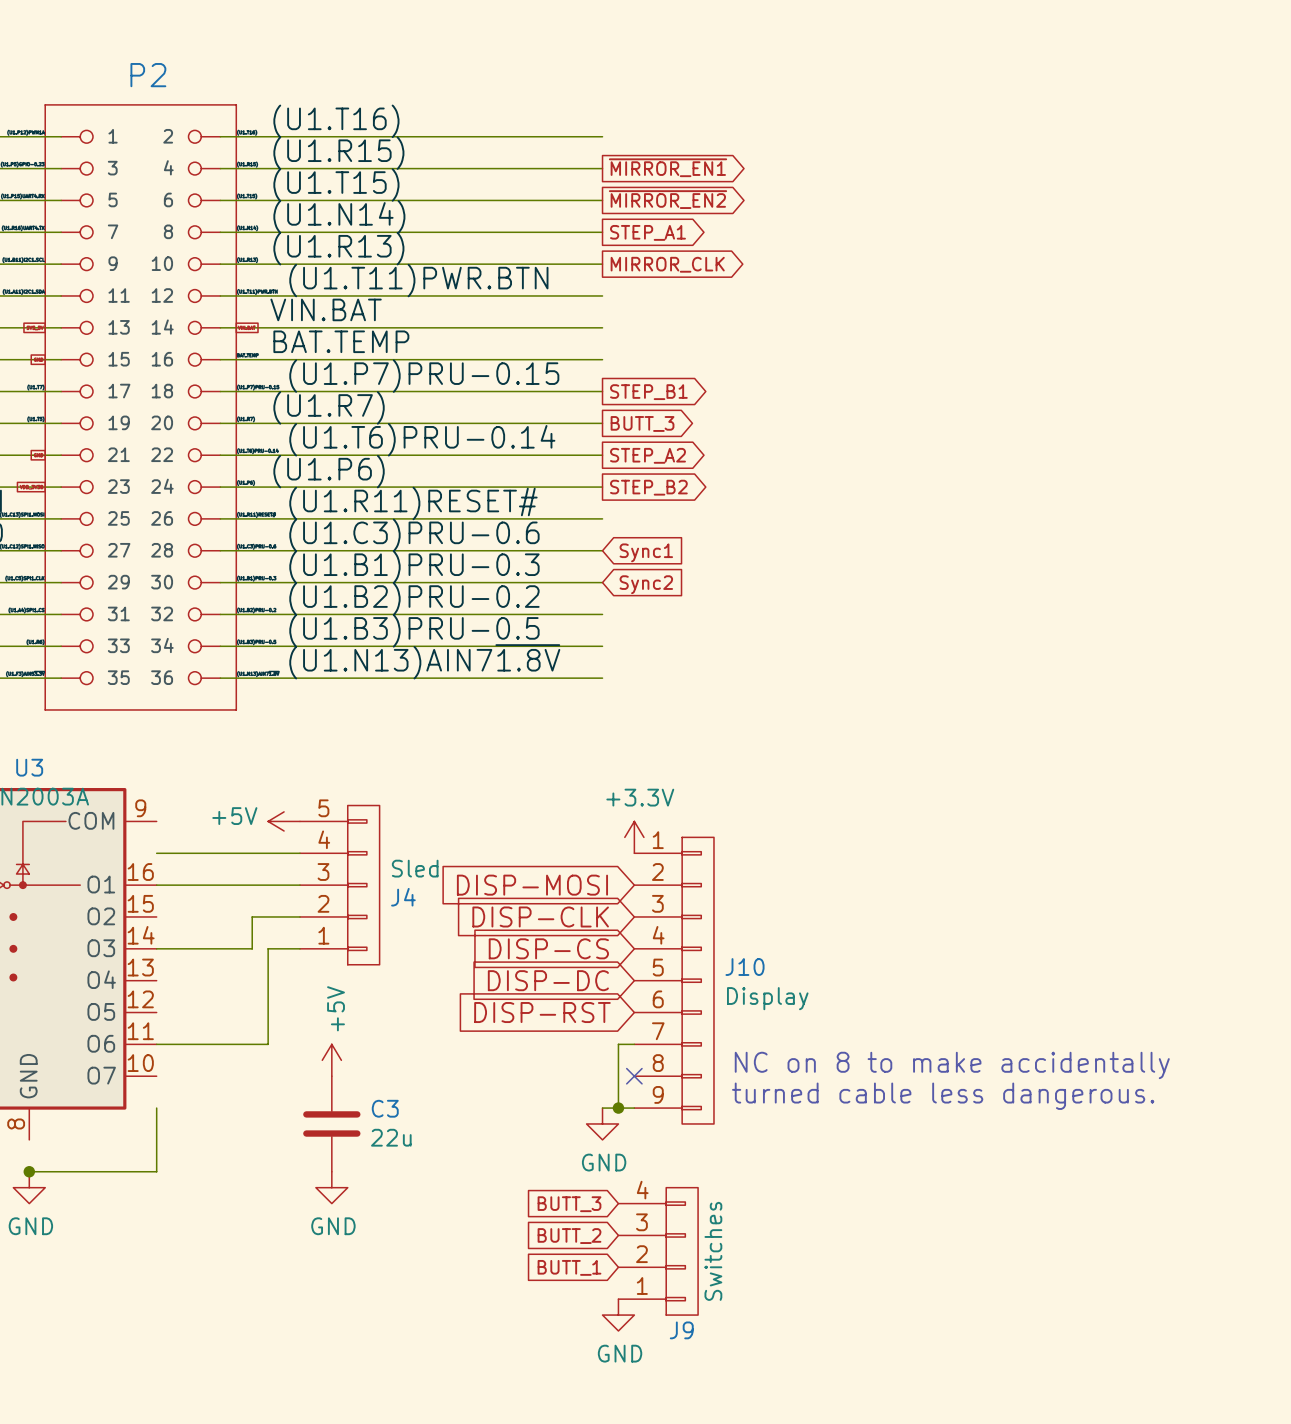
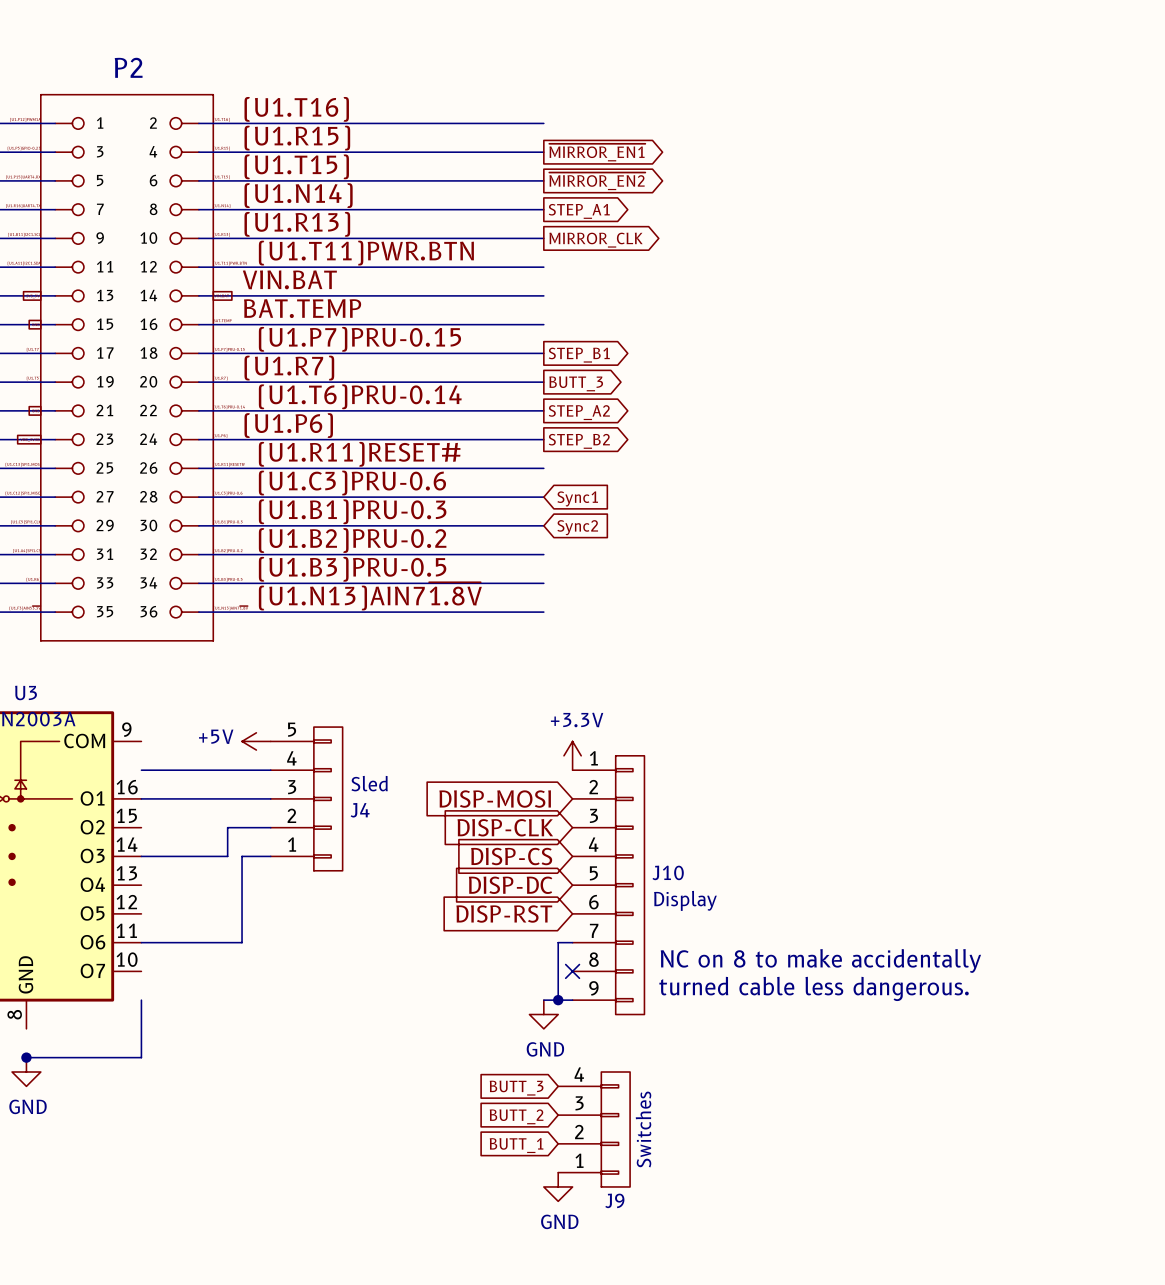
power symbol: +5V (331, 1060) -> none
C3: 22u (331, 1123) -> none
power symbol: GND (331, 1187) -> none

